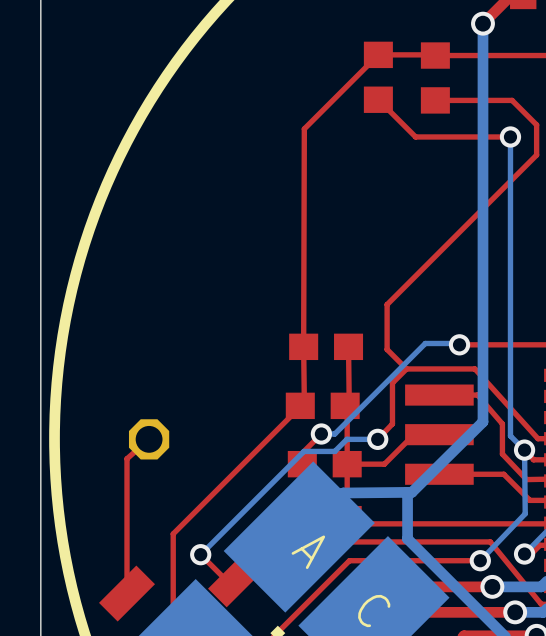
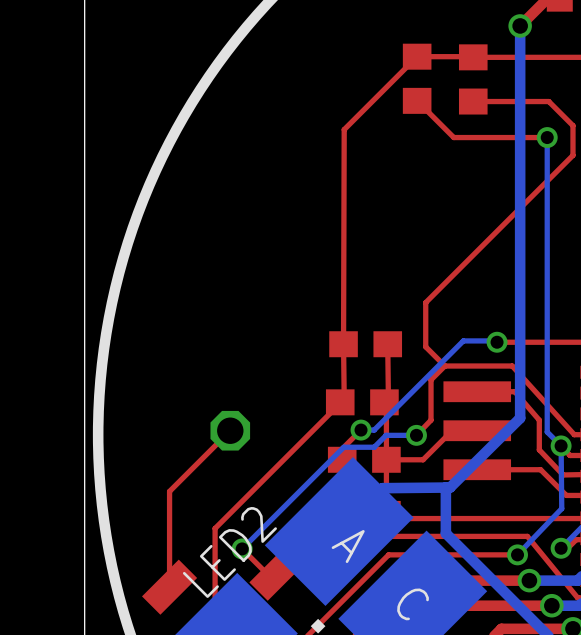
top track: (149, 439) (127, 458) (127, 496) -> (230, 430) (169, 491)
part position: (149, 439) -> (230, 430)
LED2 name: none -> LED2 (229, 552)

